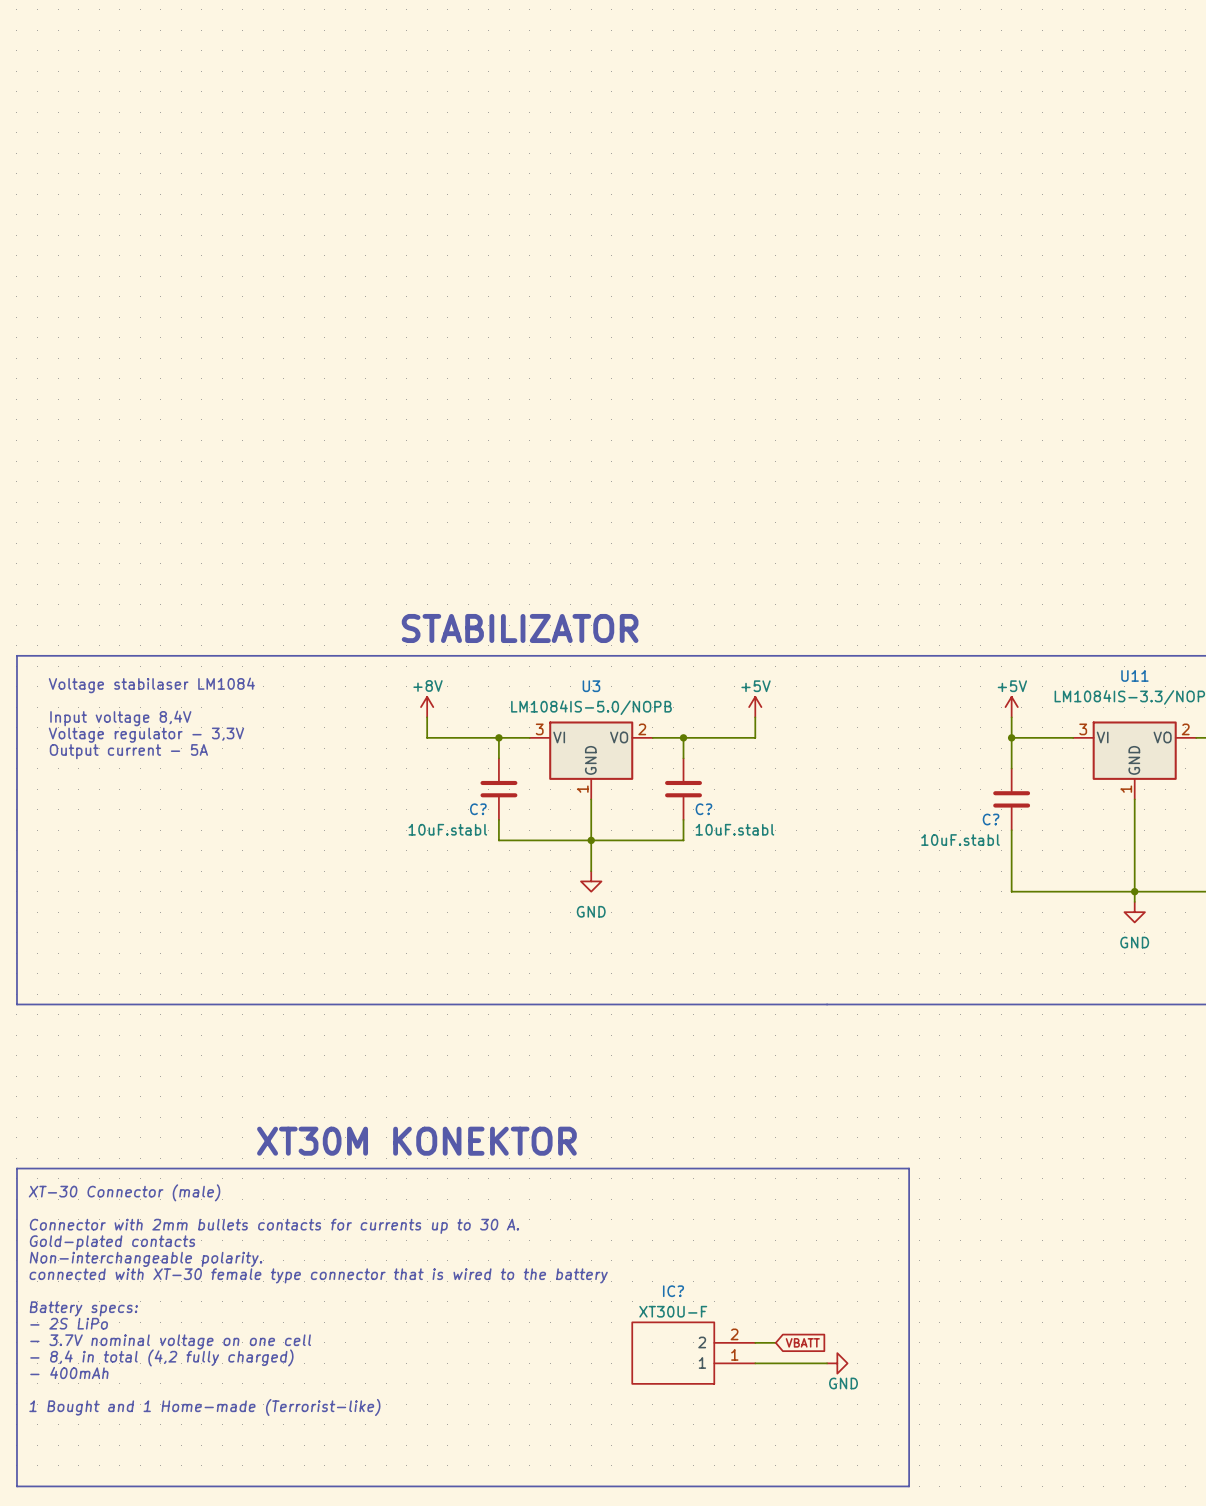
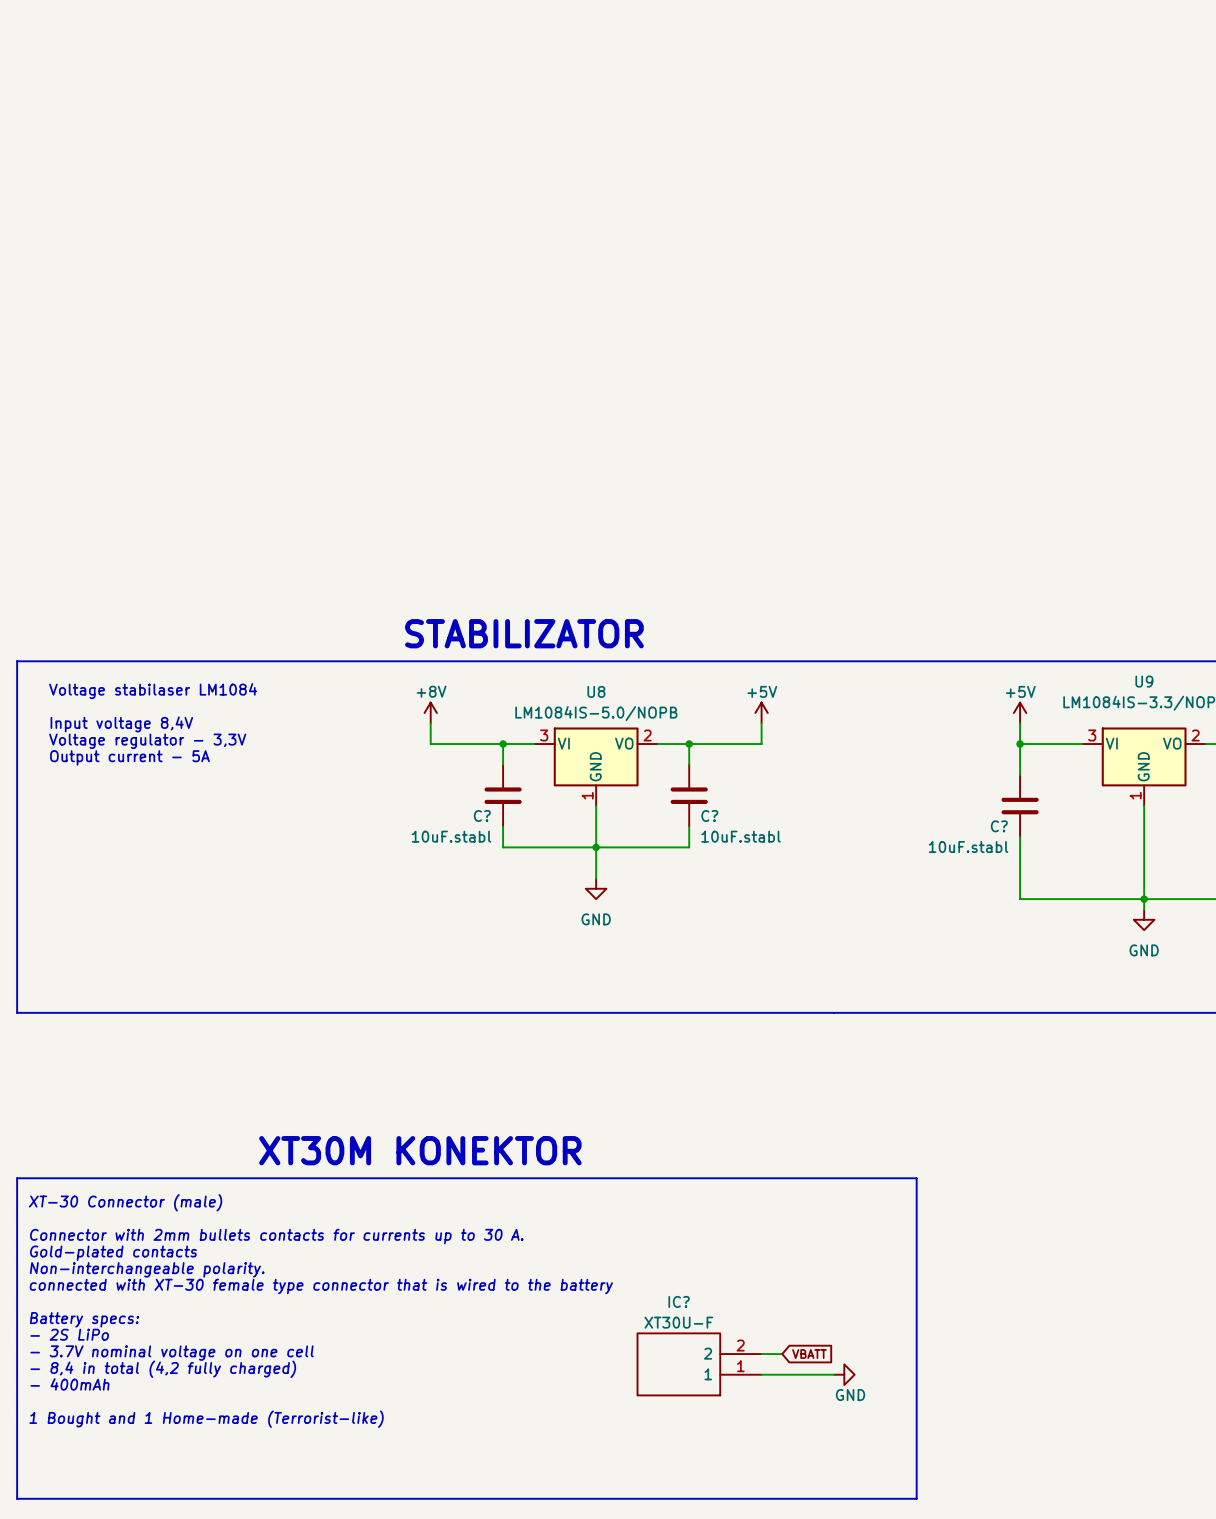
U11 name: U11 (1134, 675) -> U9 (1144, 681)
U3 name: U3 (591, 686) -> U8 (596, 691)

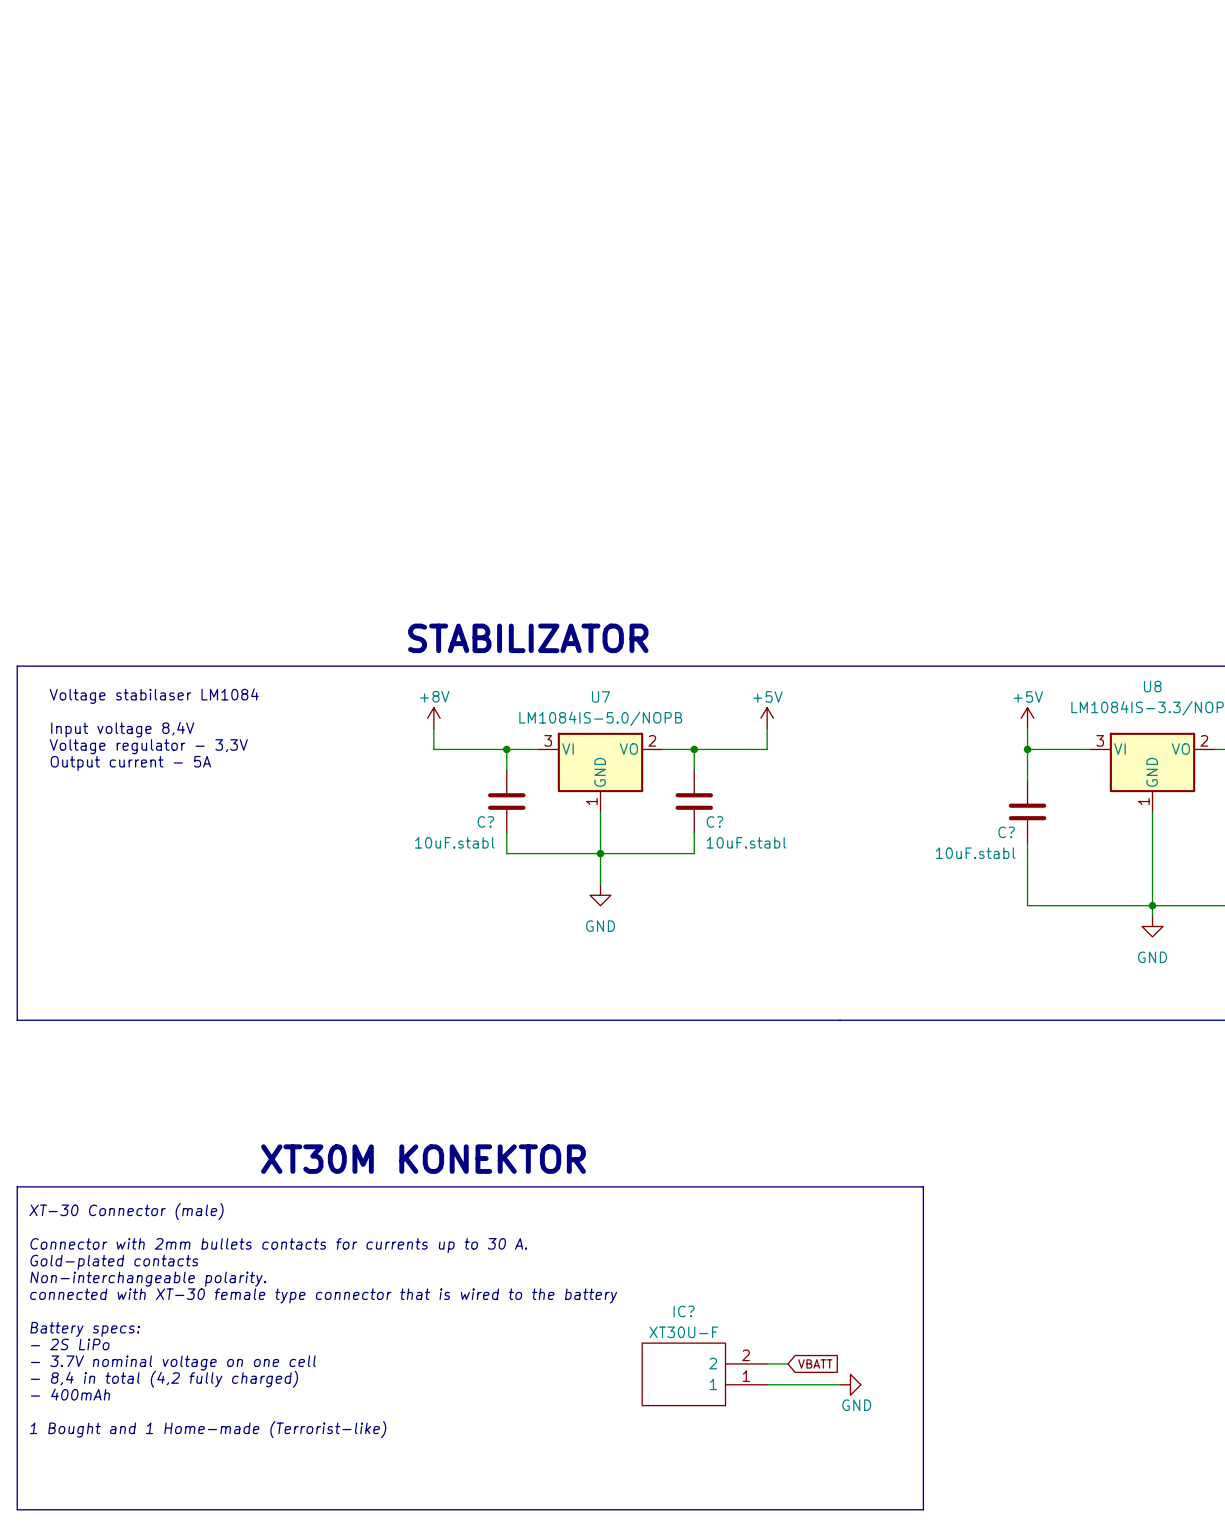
U9 name: U9 (1144, 681) -> U8 (1152, 686)
U8 name: U8 (596, 691) -> U7 (601, 696)

